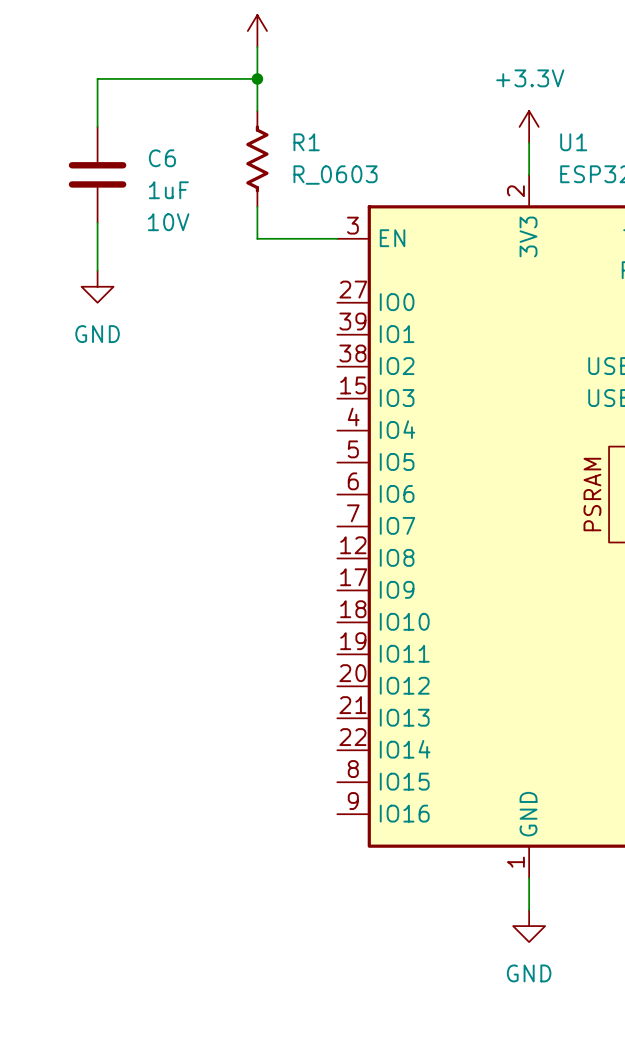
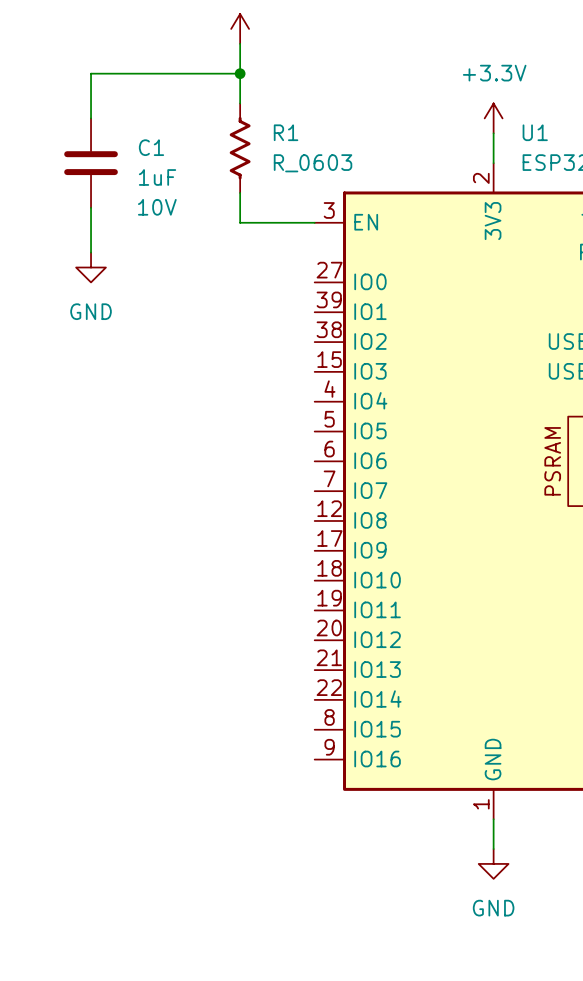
C6 name: C6 (162, 158) -> C1 (151, 147)

